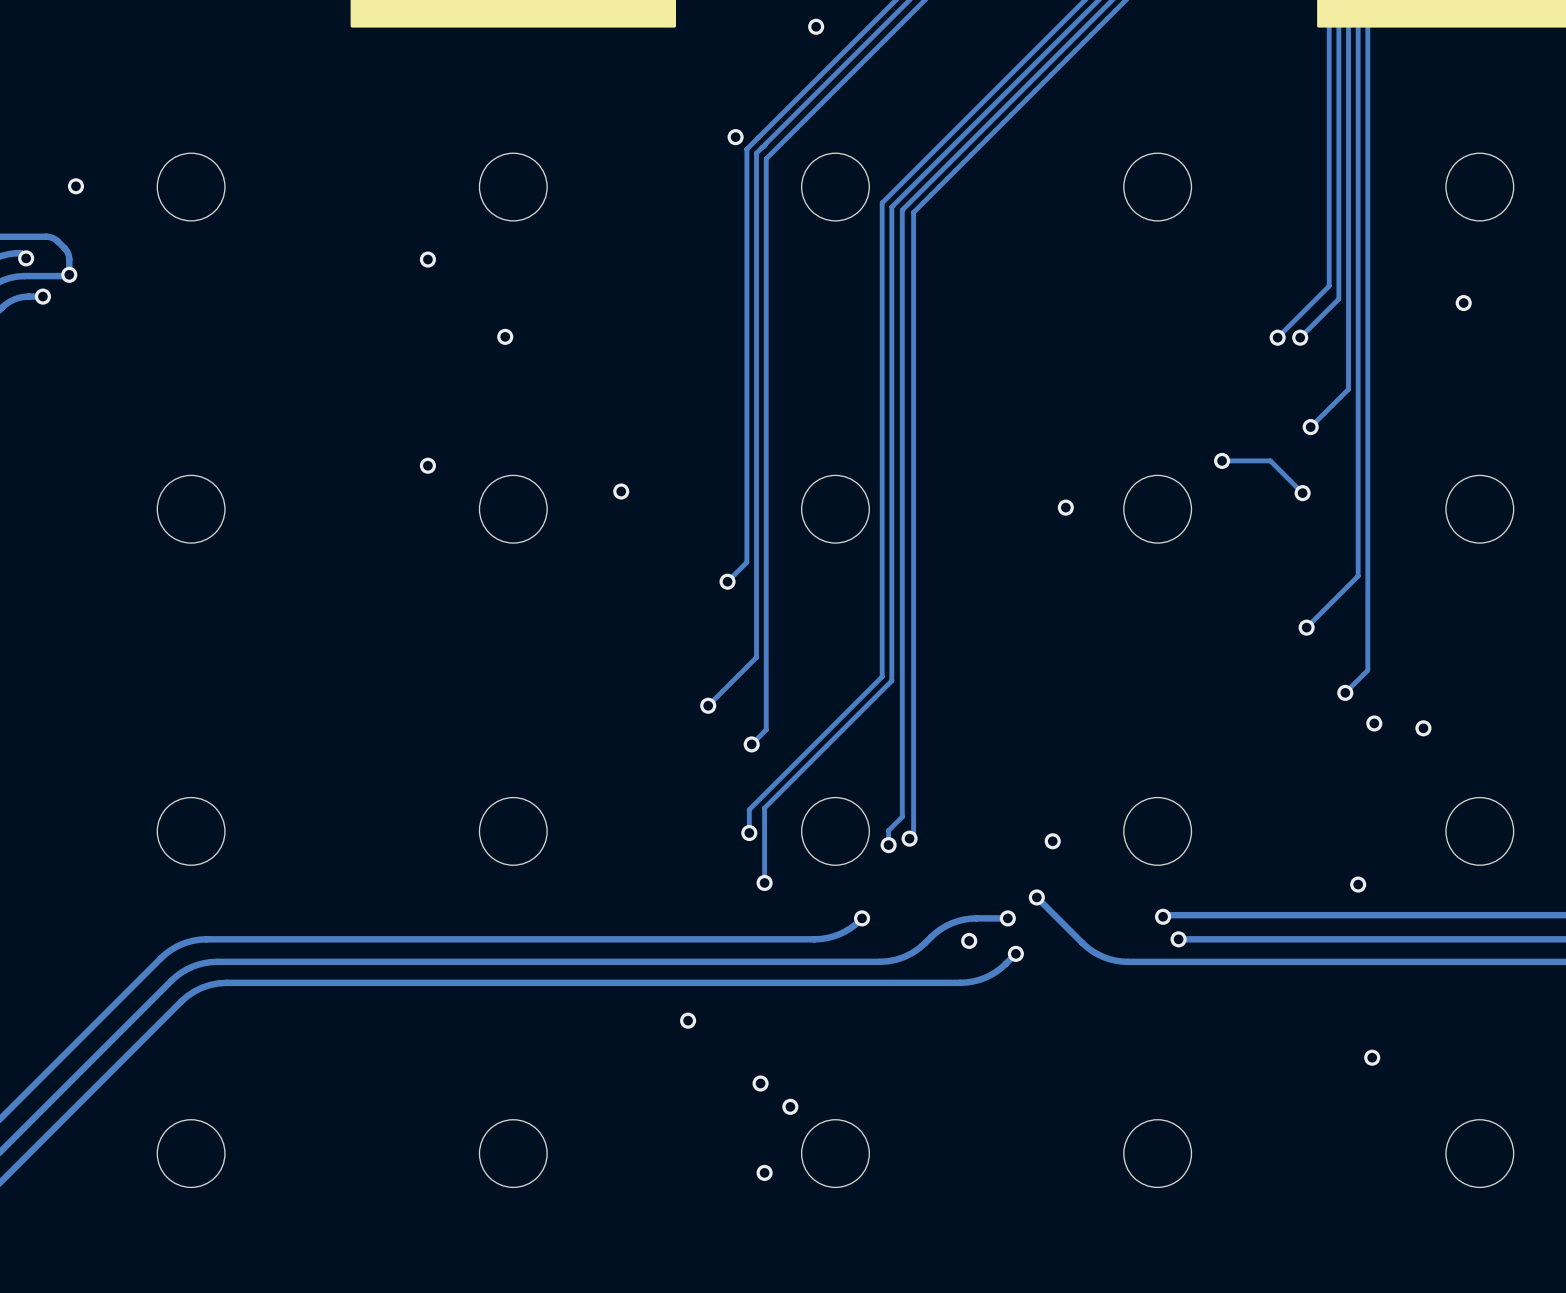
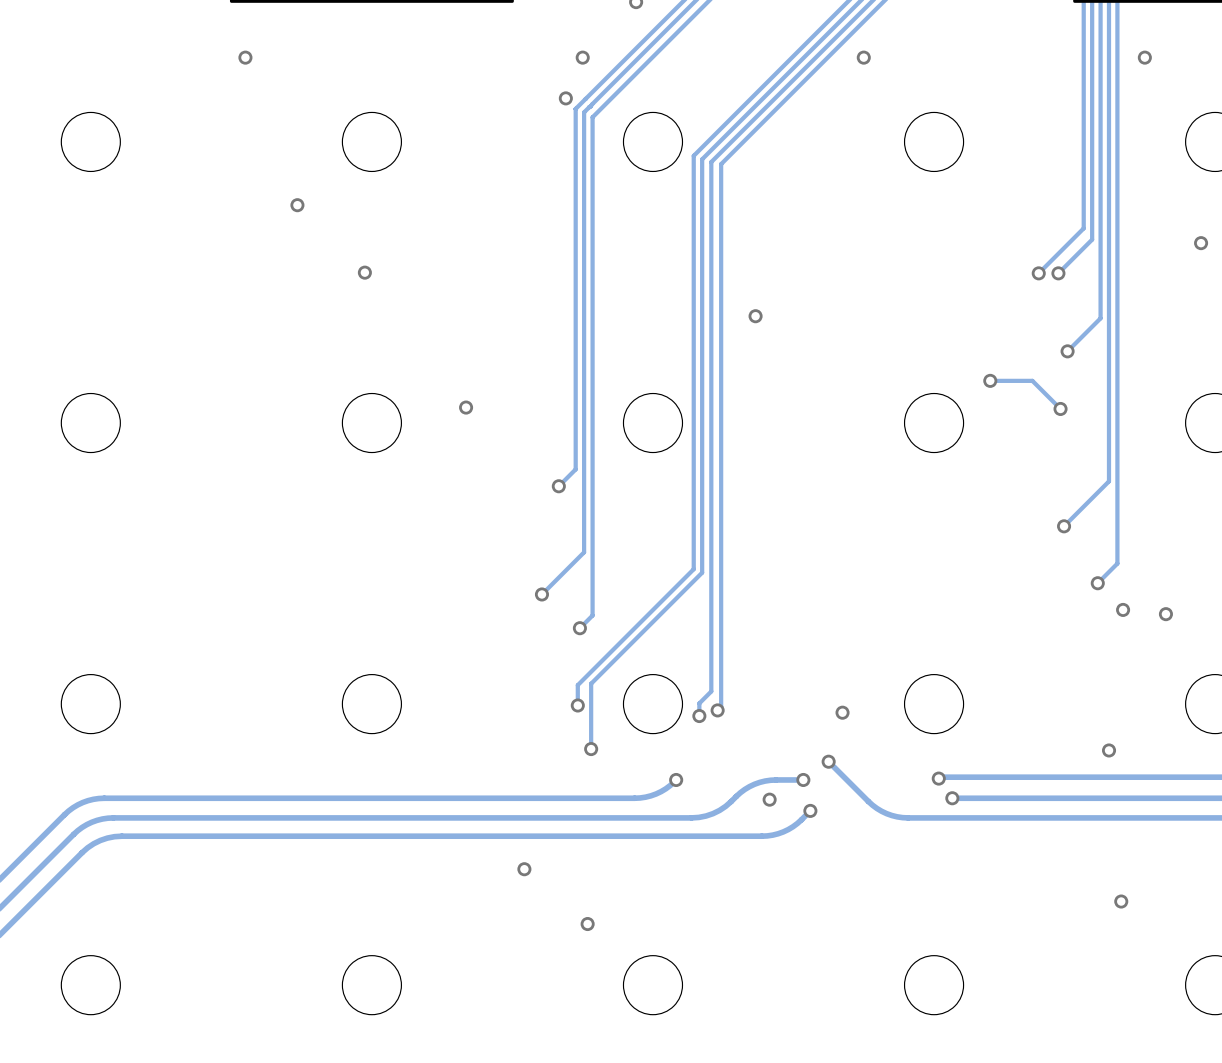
via: none -> (245, 57)
via: none -> (582, 57)
via: none -> (863, 57)
via: none -> (1144, 57)
via: (427, 465) -> none
via position: (1065, 507) -> (755, 316)
via: (790, 1106) -> none
via: (764, 1172) -> none

